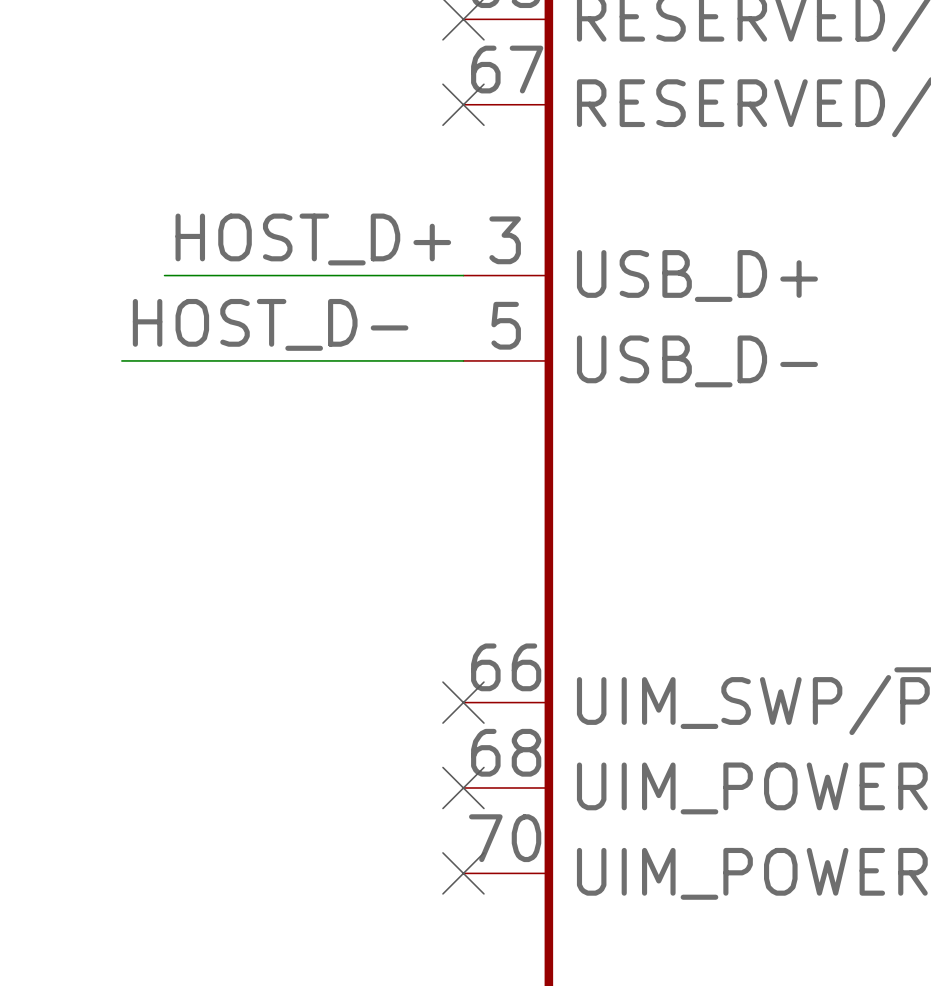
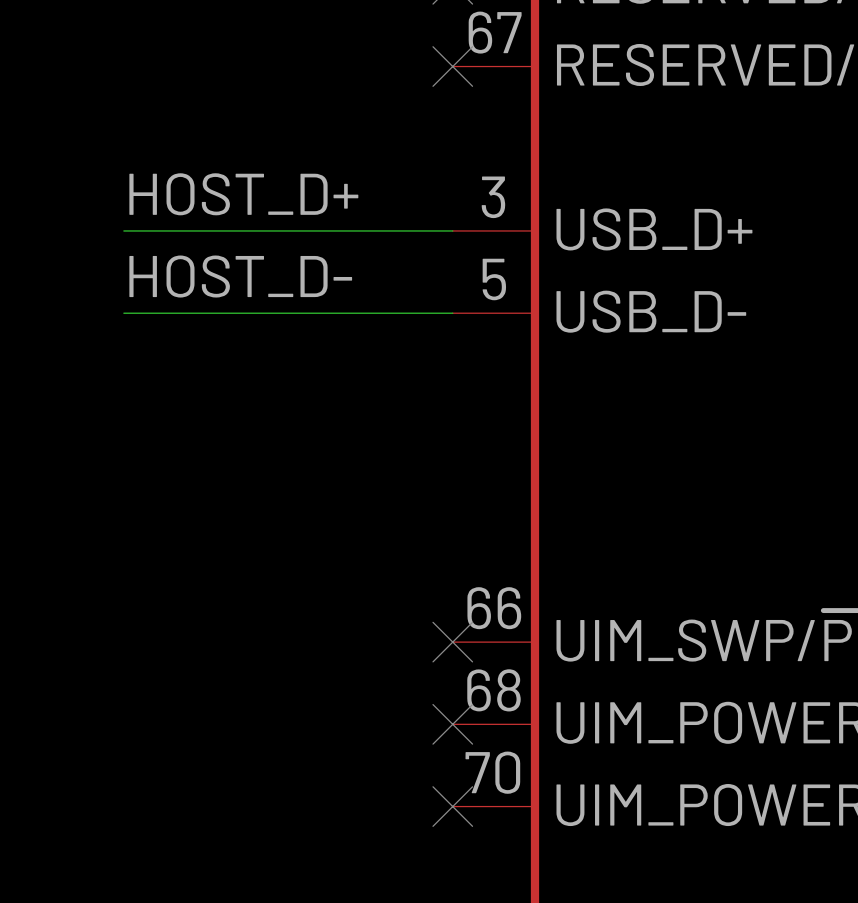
label position: HOST_D+ (313, 239) -> HOST_D+ (243, 194)
wire: none -> (123, 230) (164, 230)

